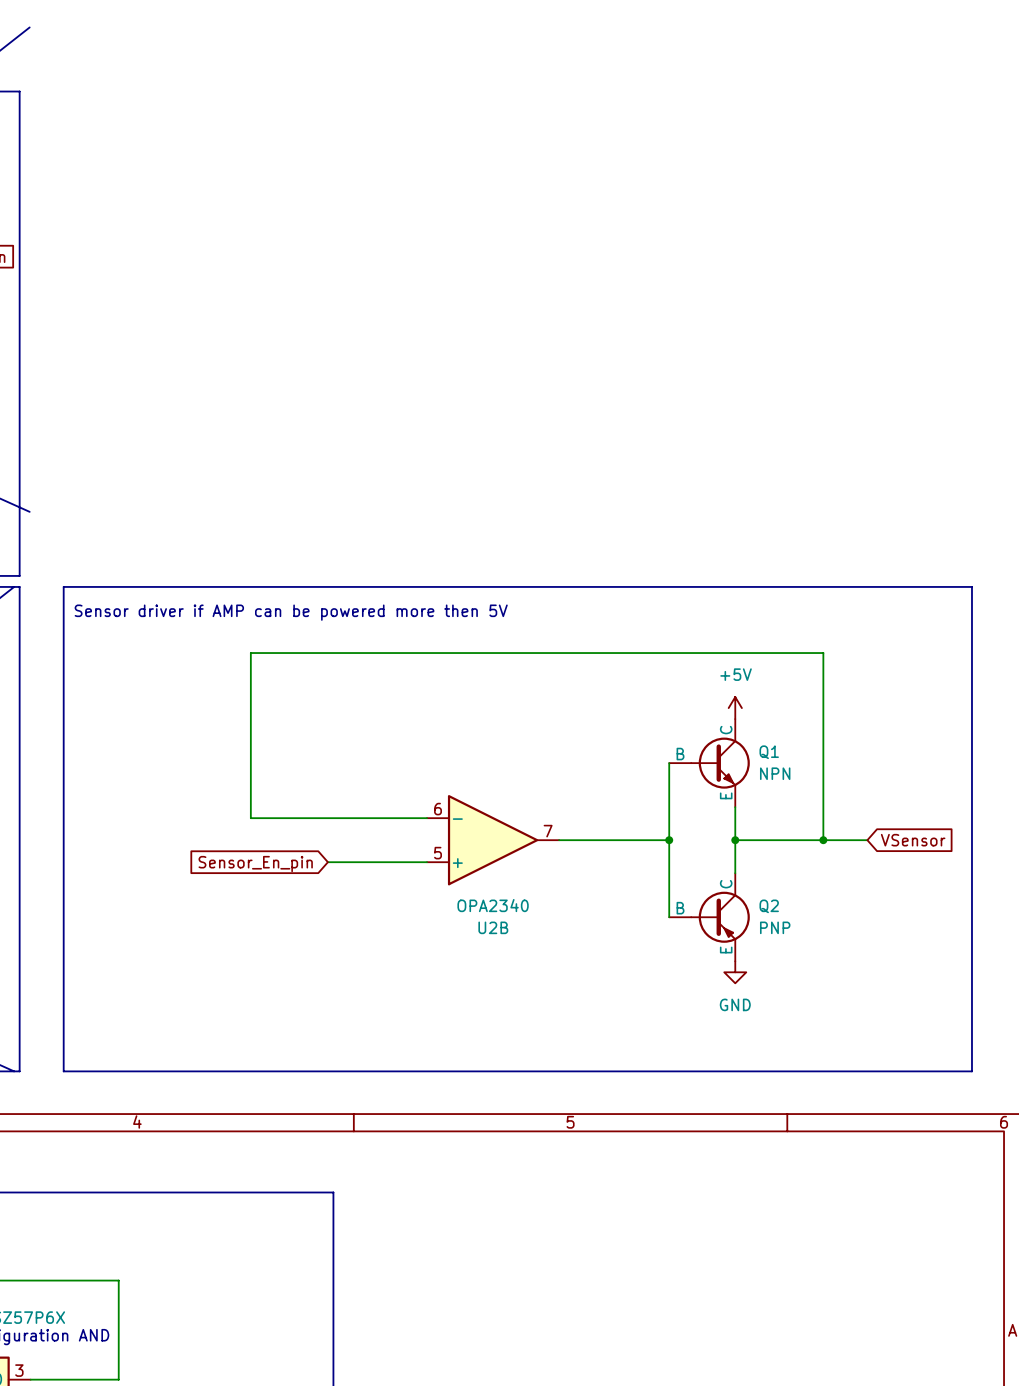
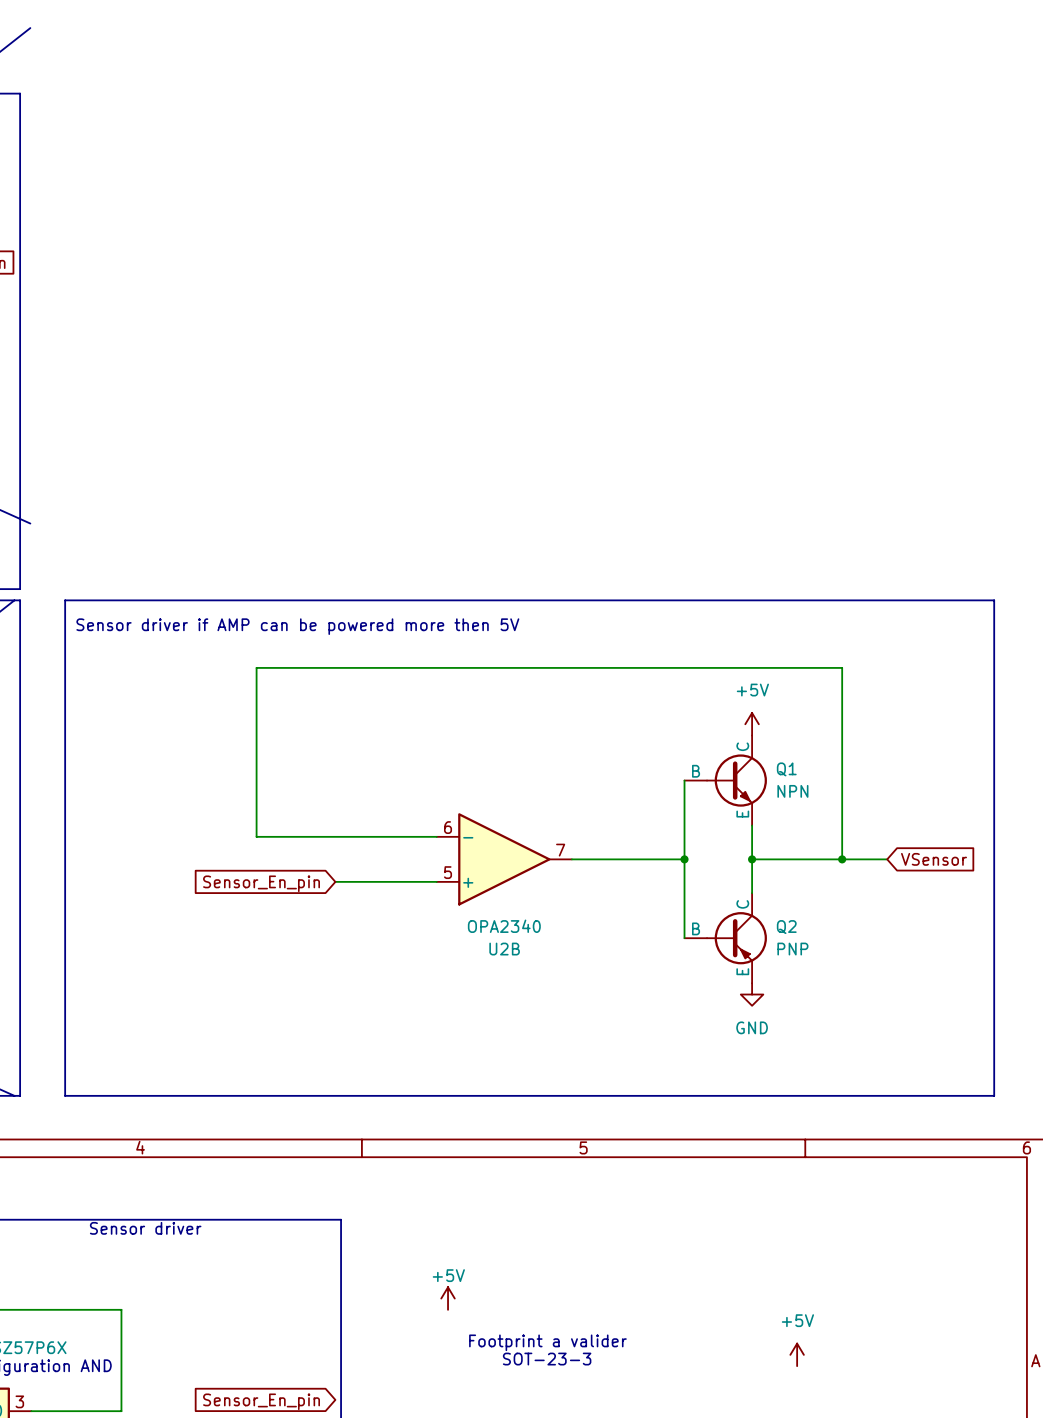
text: none -> Sensor driver (145, 1228)
power symbol: none -> +5V (448, 1298)
text: none -> Footprint a valider (547, 1342)
power symbol: none -> +5V (797, 1354)
text: none -> SOT-23-3 (547, 1359)
global label: none -> Sensor_En_pin (261, 1401)

